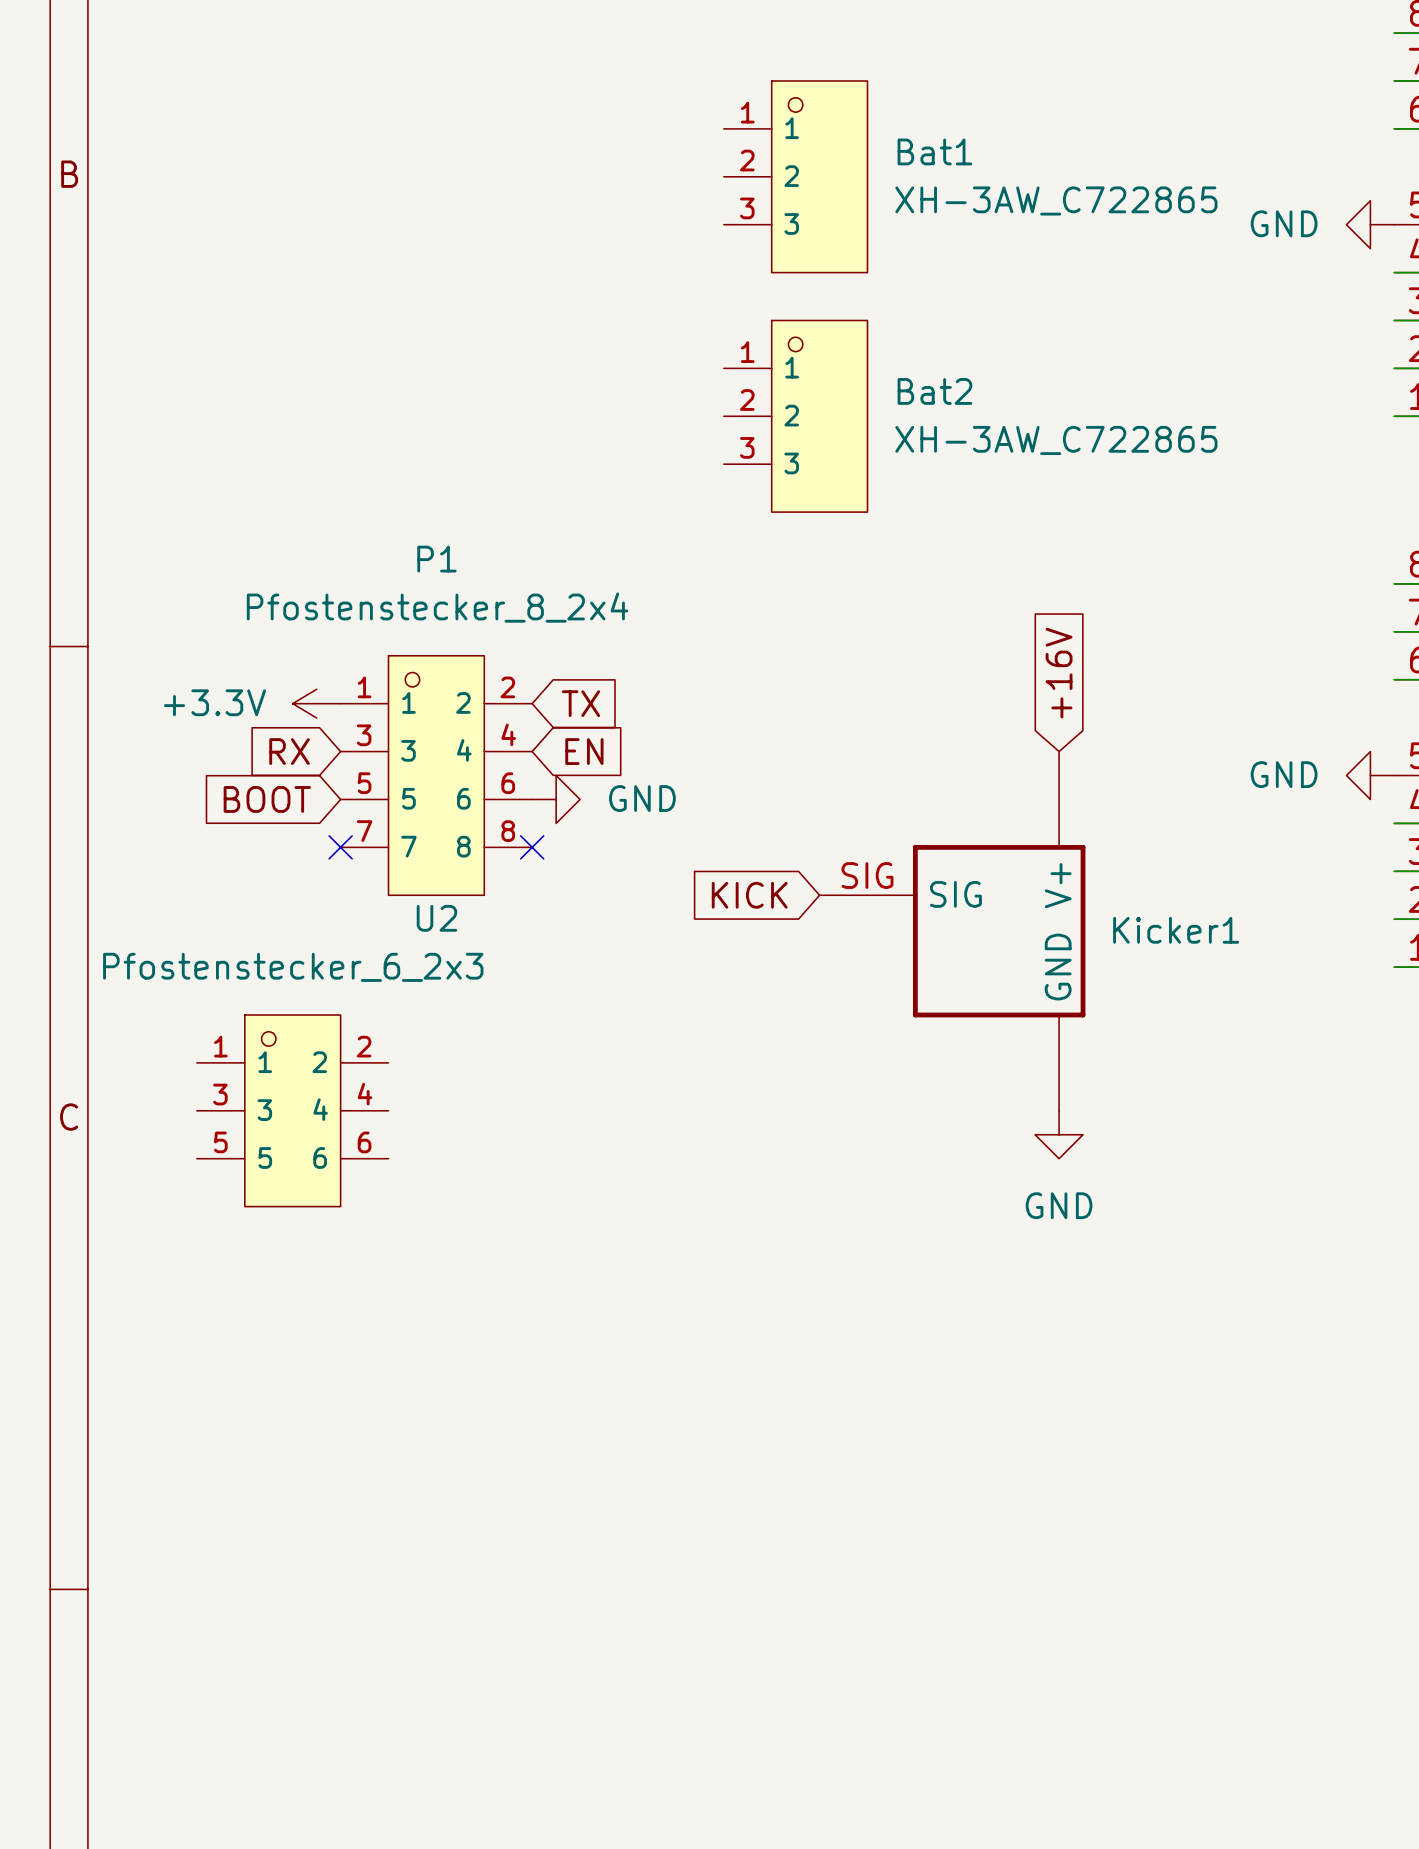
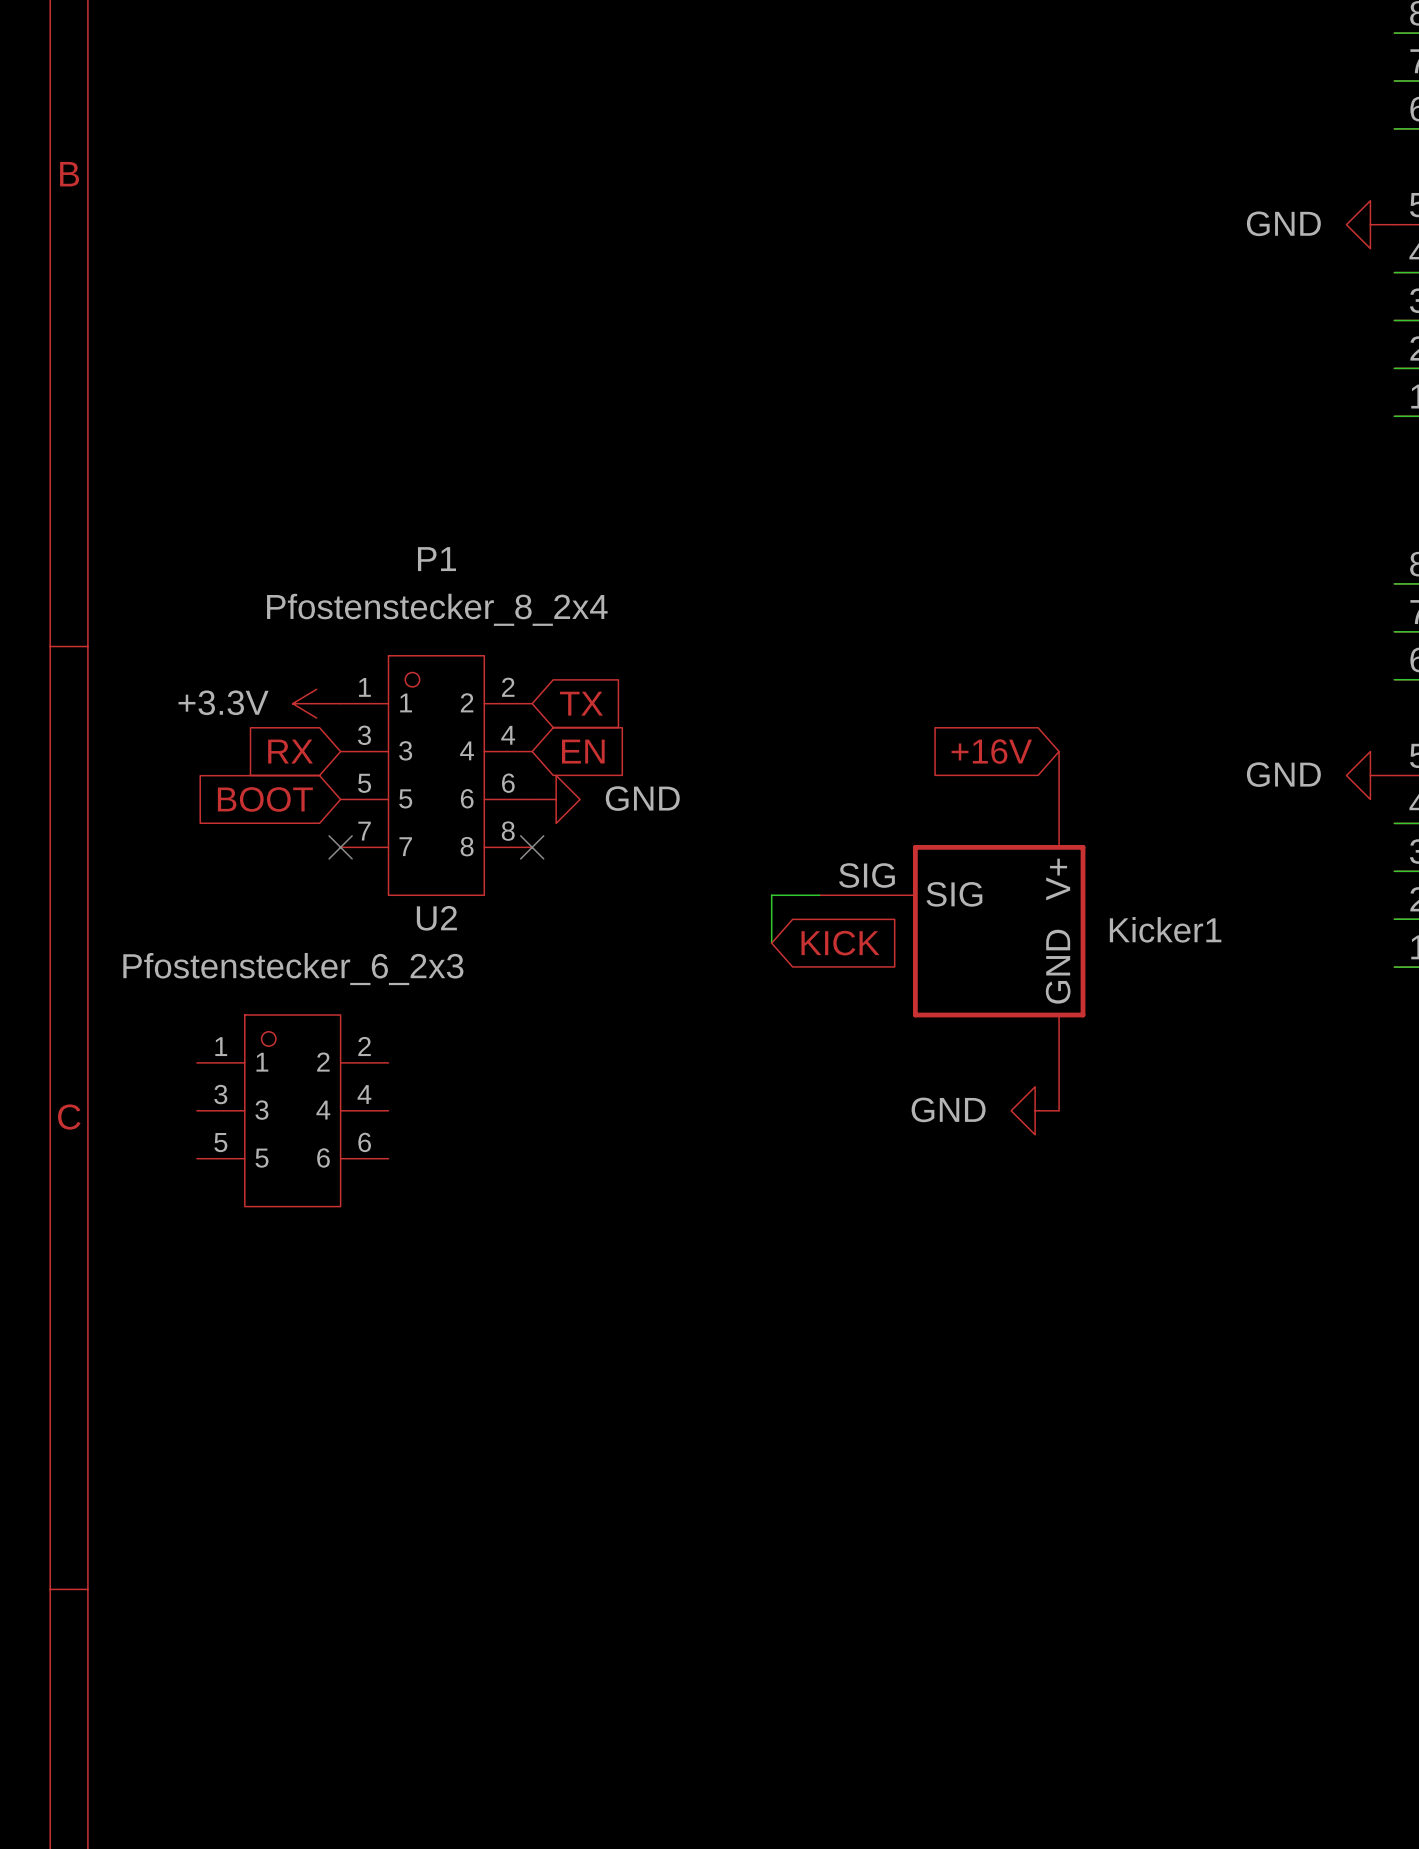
Bat1: XH-3AW_C722865 (795, 176) -> none
Bat2: XH-3AW_C722865 (795, 416) -> none
global label rotation: 0° (1059, 673) -> 90° counterclockwise (991, 751)
global label rotation: 0° (749, 895) -> 180° (840, 943)
wire: none -> (819, 895) (771, 895) (771, 943)
power symbol rotation: 0° (1059, 1134) -> 90° clockwise (1035, 1110)
power symbol position: GND (1059, 1134) -> GND (1035, 1110)

